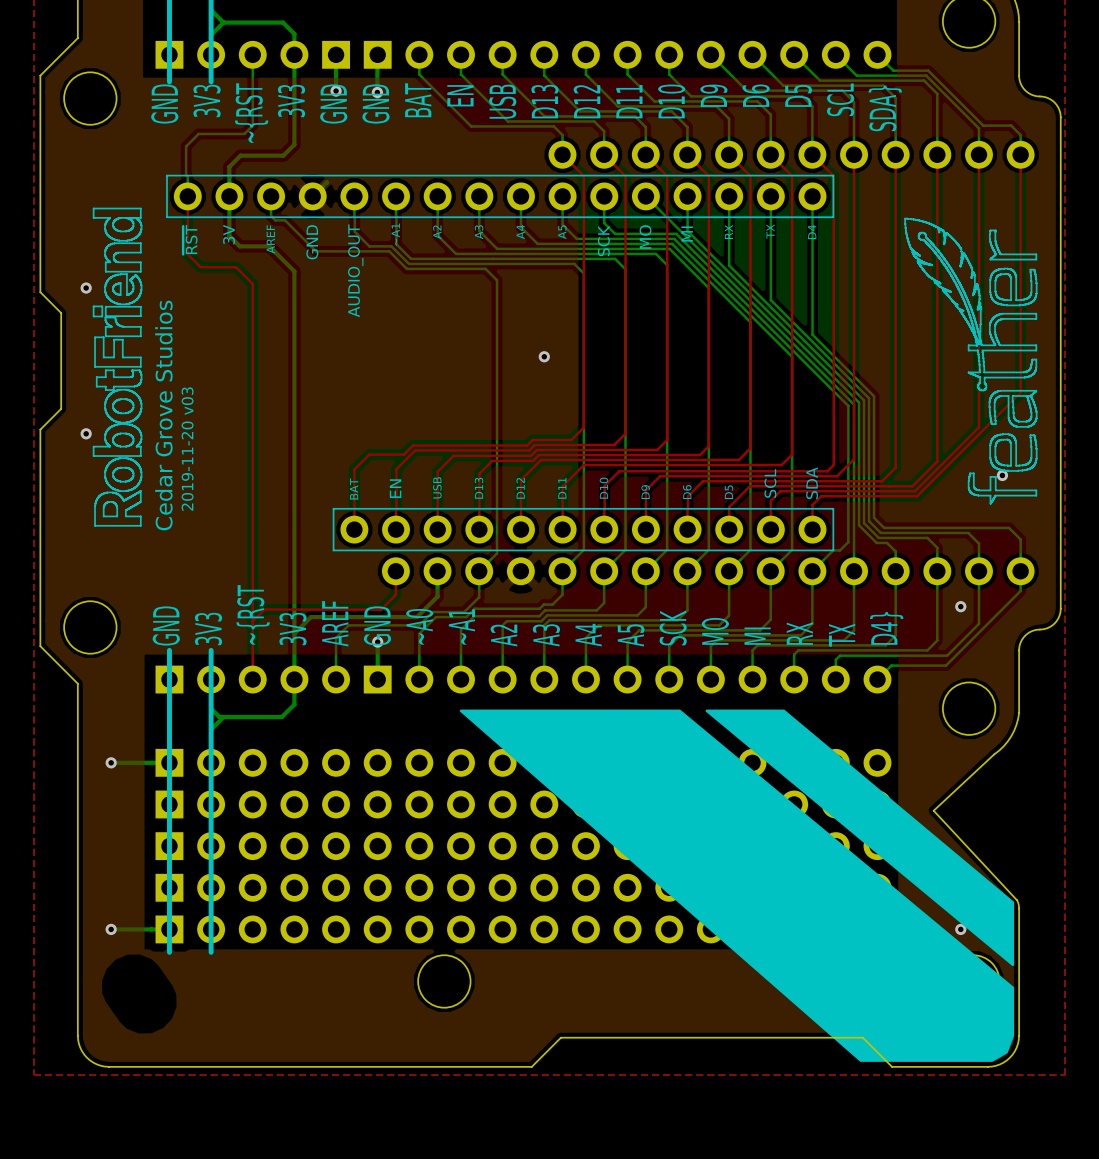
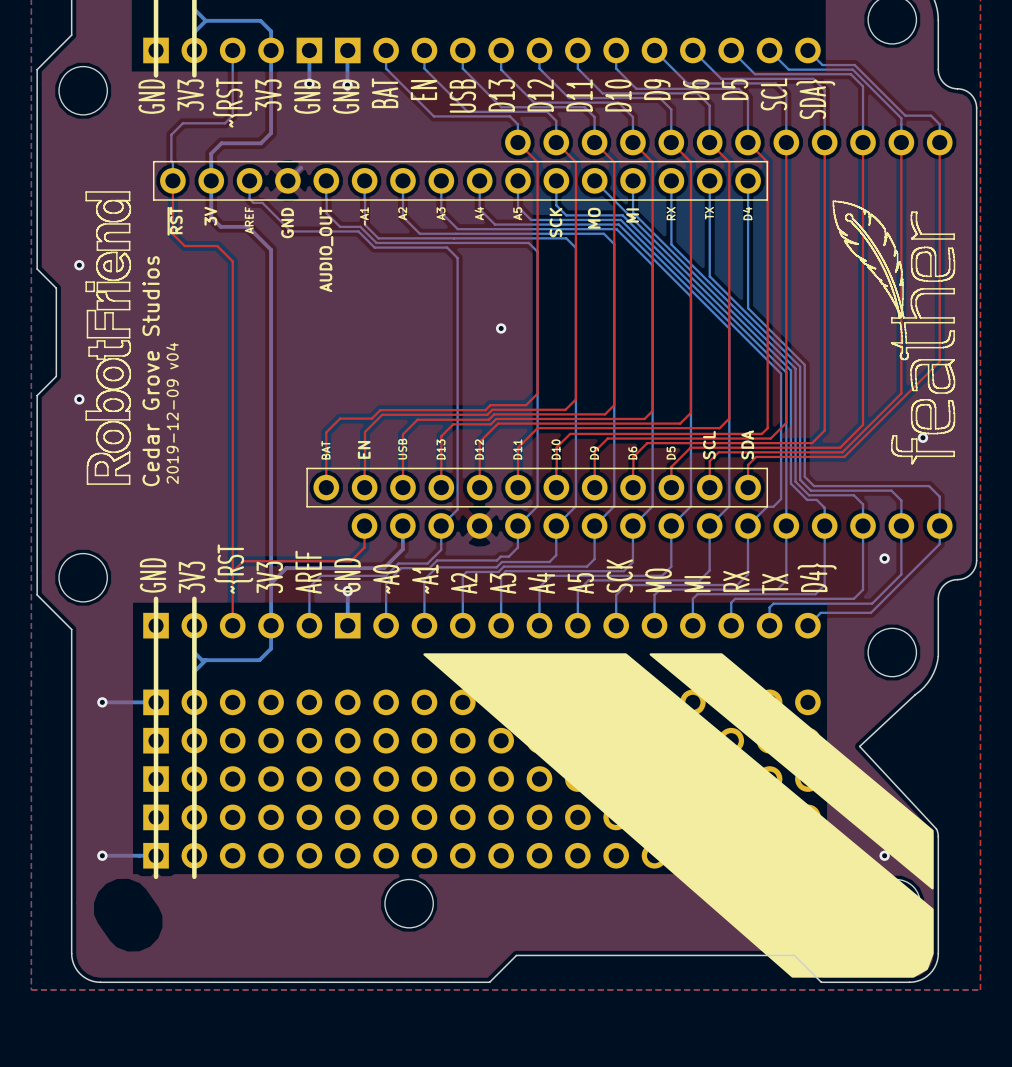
text: 2019-11-20 v03 (187, 449) -> 2019-12-09 v04 (172, 413)

